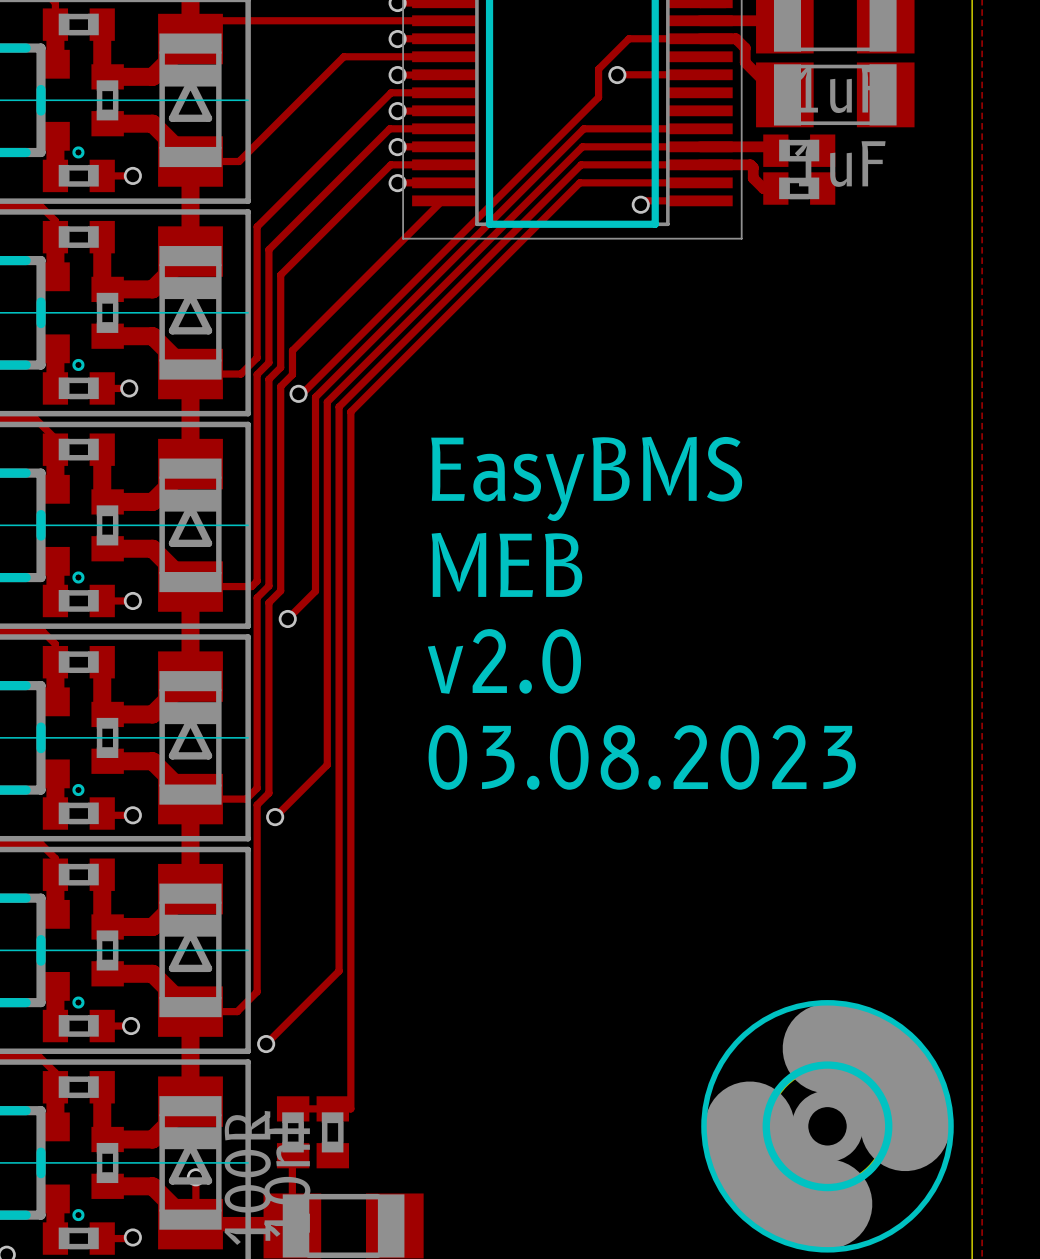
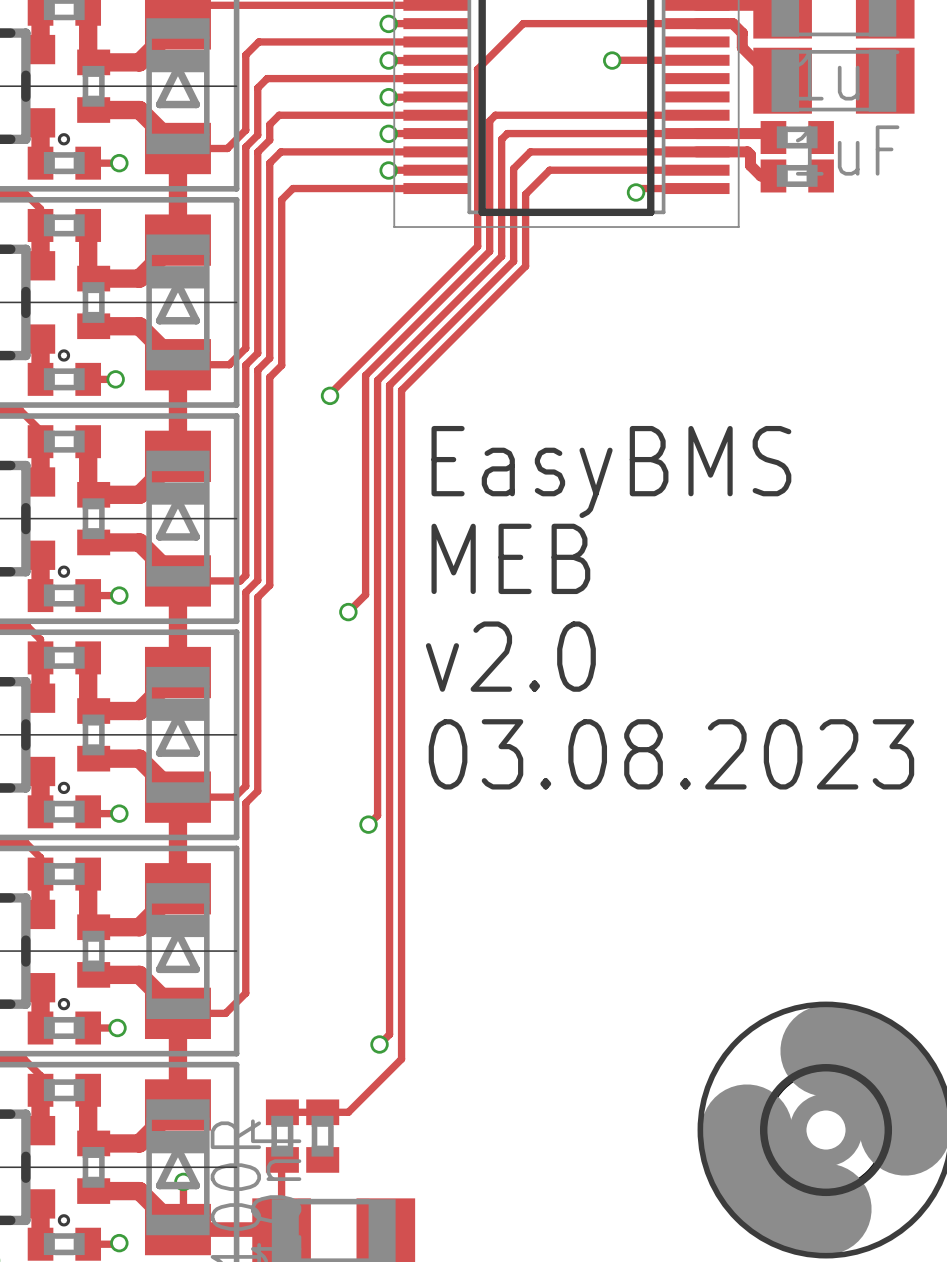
track: (628, 38) (598, 69) (598, 97) (302, 393) (298, 393) -> (624, 23) (523, 23) (477, 69)
track: (343, 56) (257, 143) -> (333, 41) (258, 41) (245, 55) (245, 130)
track: none -> (477, 69) (477, 246) (330, 395)
track: (391, 92) (257, 226) -> (382, 78) (267, 78) (257, 88) (257, 135) (245, 147) (245, 214)
track: (389, 128) (268, 249) -> (380, 115) (279, 115) (269, 124) (269, 140) (257, 152) (257, 238)
track: (583, 128) (315, 397) (315, 591) (287, 618) -> (578, 115) (495, 115) (489, 121) (489, 251) (365, 375) (365, 594) (348, 612)
track: (582, 146) (327, 402) (327, 764) (275, 817) -> (576, 133) (507, 133) (501, 139) (501, 256) (377, 380) (377, 815) (368, 824)
track: (390, 164) (280, 274) -> (381, 151) (280, 151) (269, 163) (269, 263)
track: (581, 164) (339, 406) (339, 971) (266, 1044) -> (575, 151) (530, 151) (513, 168) (513, 261) (389, 385) (389, 1034) (379, 1044)
track: (579, 182) (350, 411) (350, 1108) -> (574, 170) (549, 170) (525, 194) (525, 266) (401, 390) (401, 1059) (348, 1112) (341, 1112)
track: (442, 200) (292, 350) -> (434, 188) (292, 188) (281, 199) (281, 340)
via position: (298, 393) -> (330, 395)
via position: (287, 618) -> (348, 612)
via position: (275, 817) -> (368, 824)
via: none -> (379, 1044)
via: (266, 1044) -> none

